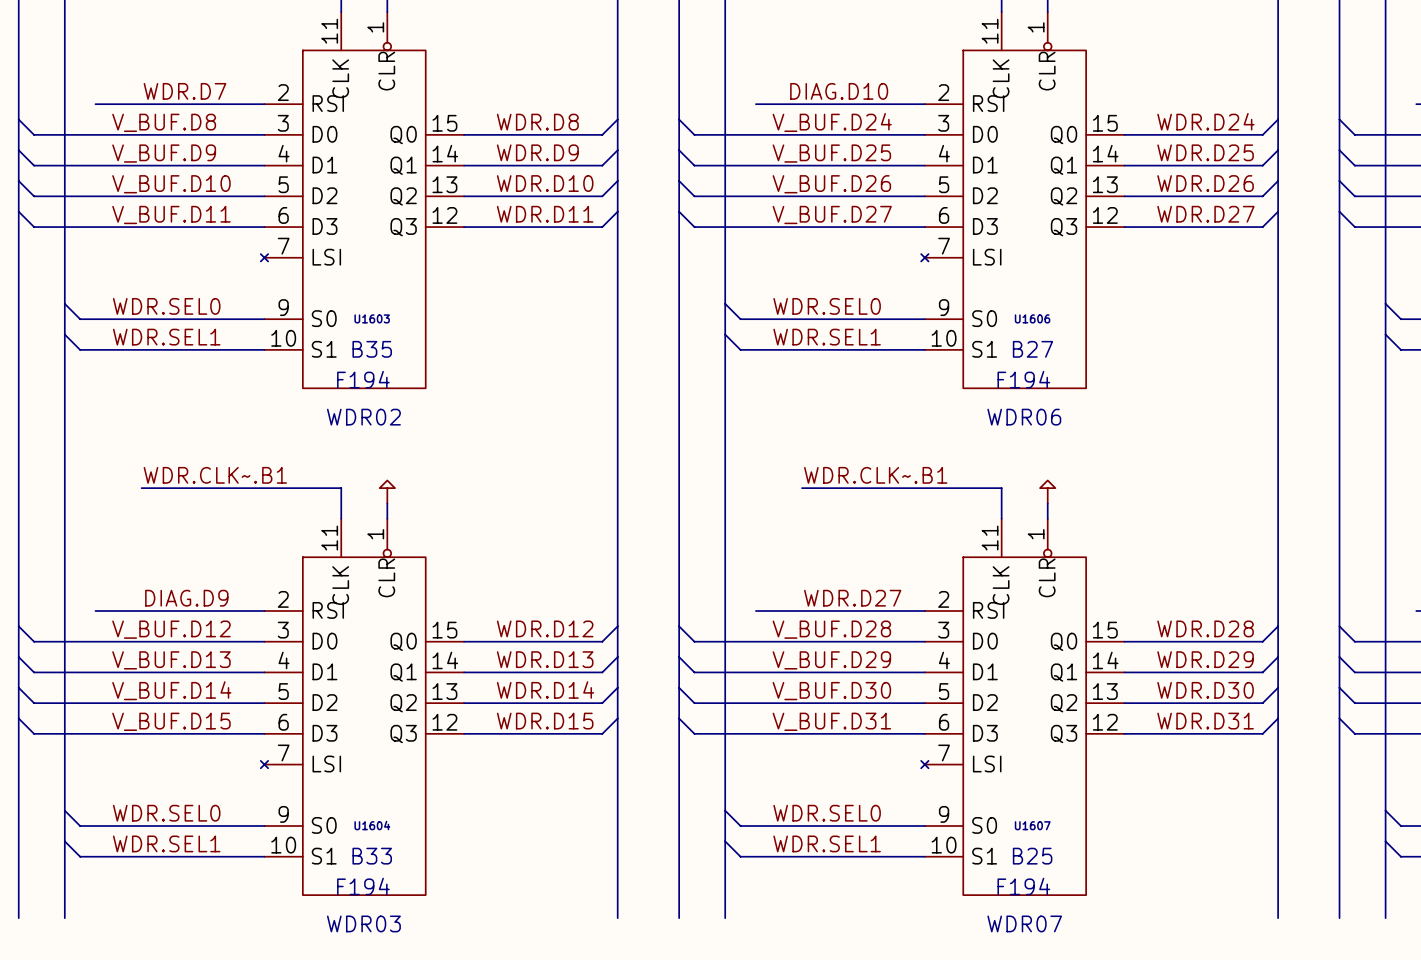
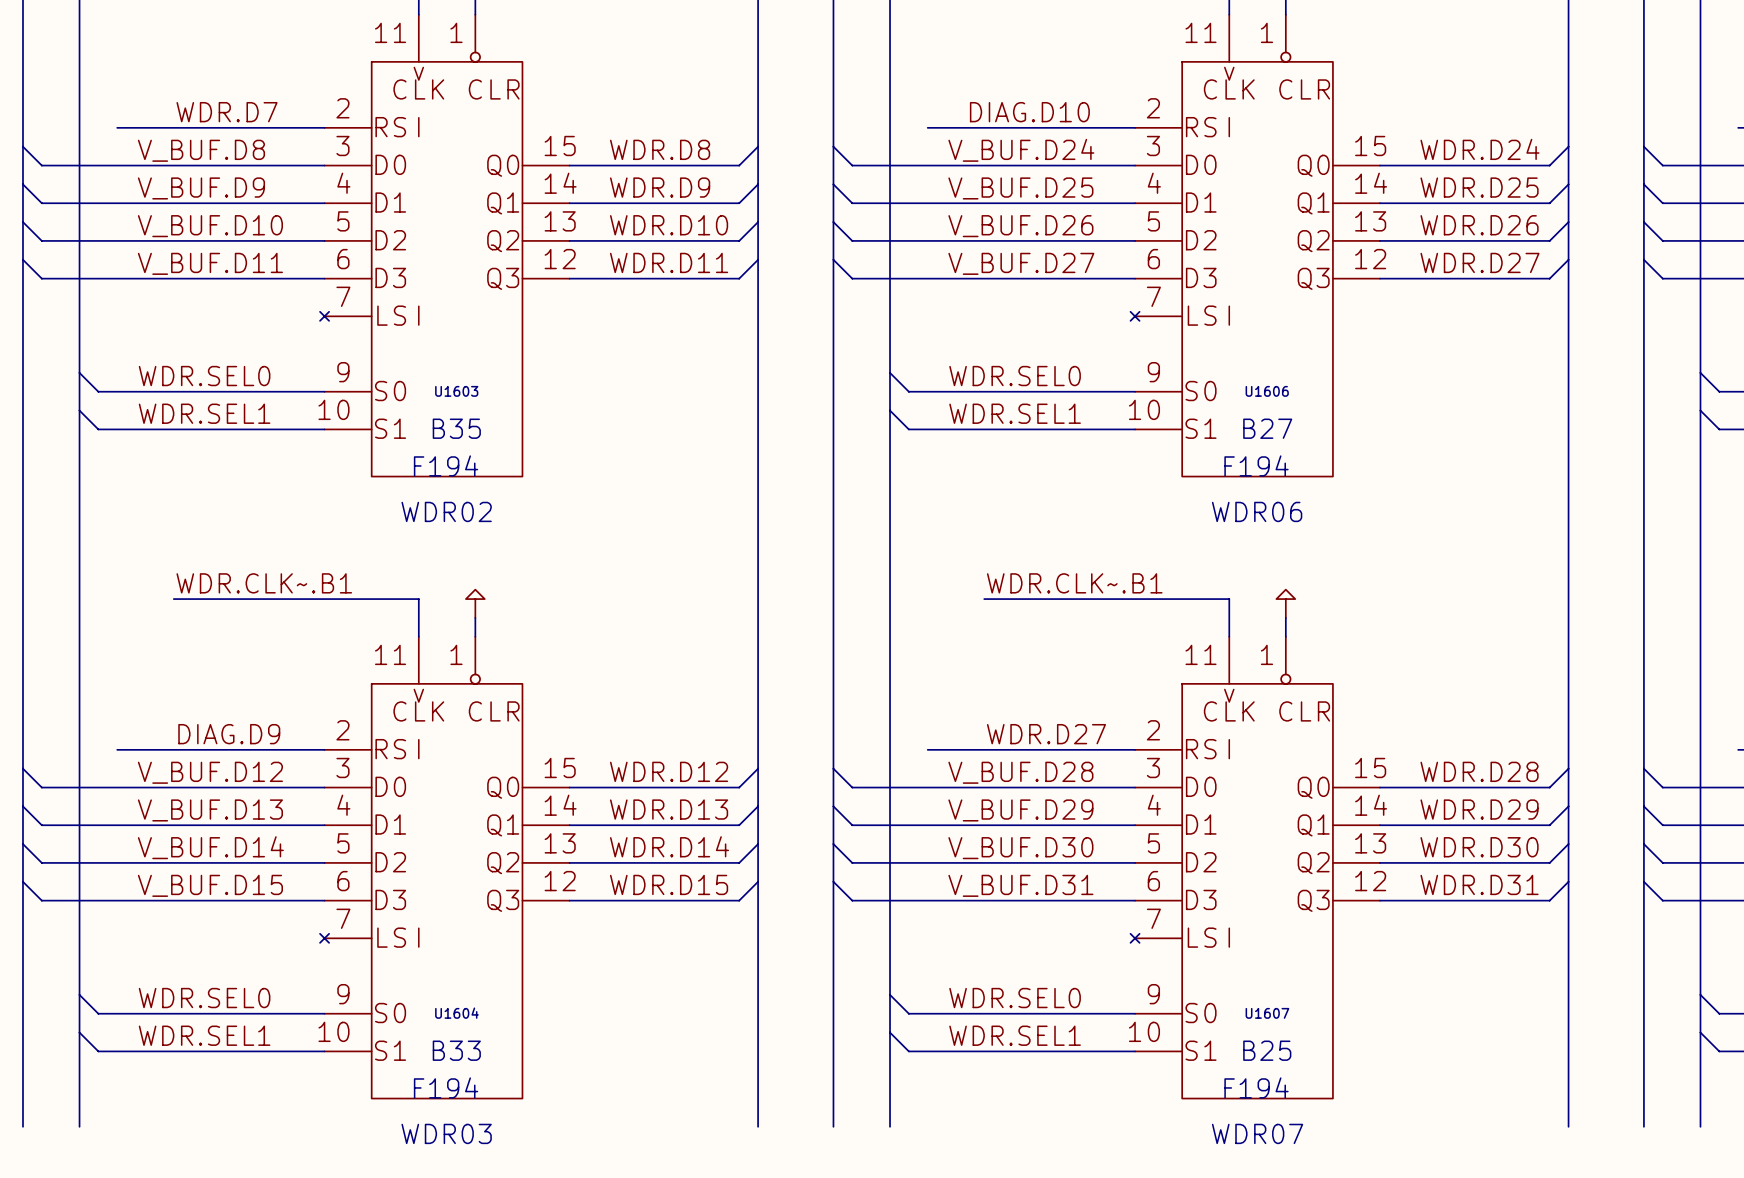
U1603 symbol: [264, 12, 465, 389] -> [324, 14, 570, 477]
U1606 symbol: [924, 12, 1125, 389] -> [1135, 14, 1381, 477]
U1604 symbol: [264, 518, 465, 896] -> [324, 636, 570, 1099]
U1607 symbol: [924, 518, 1125, 896] -> [1135, 636, 1381, 1099]

